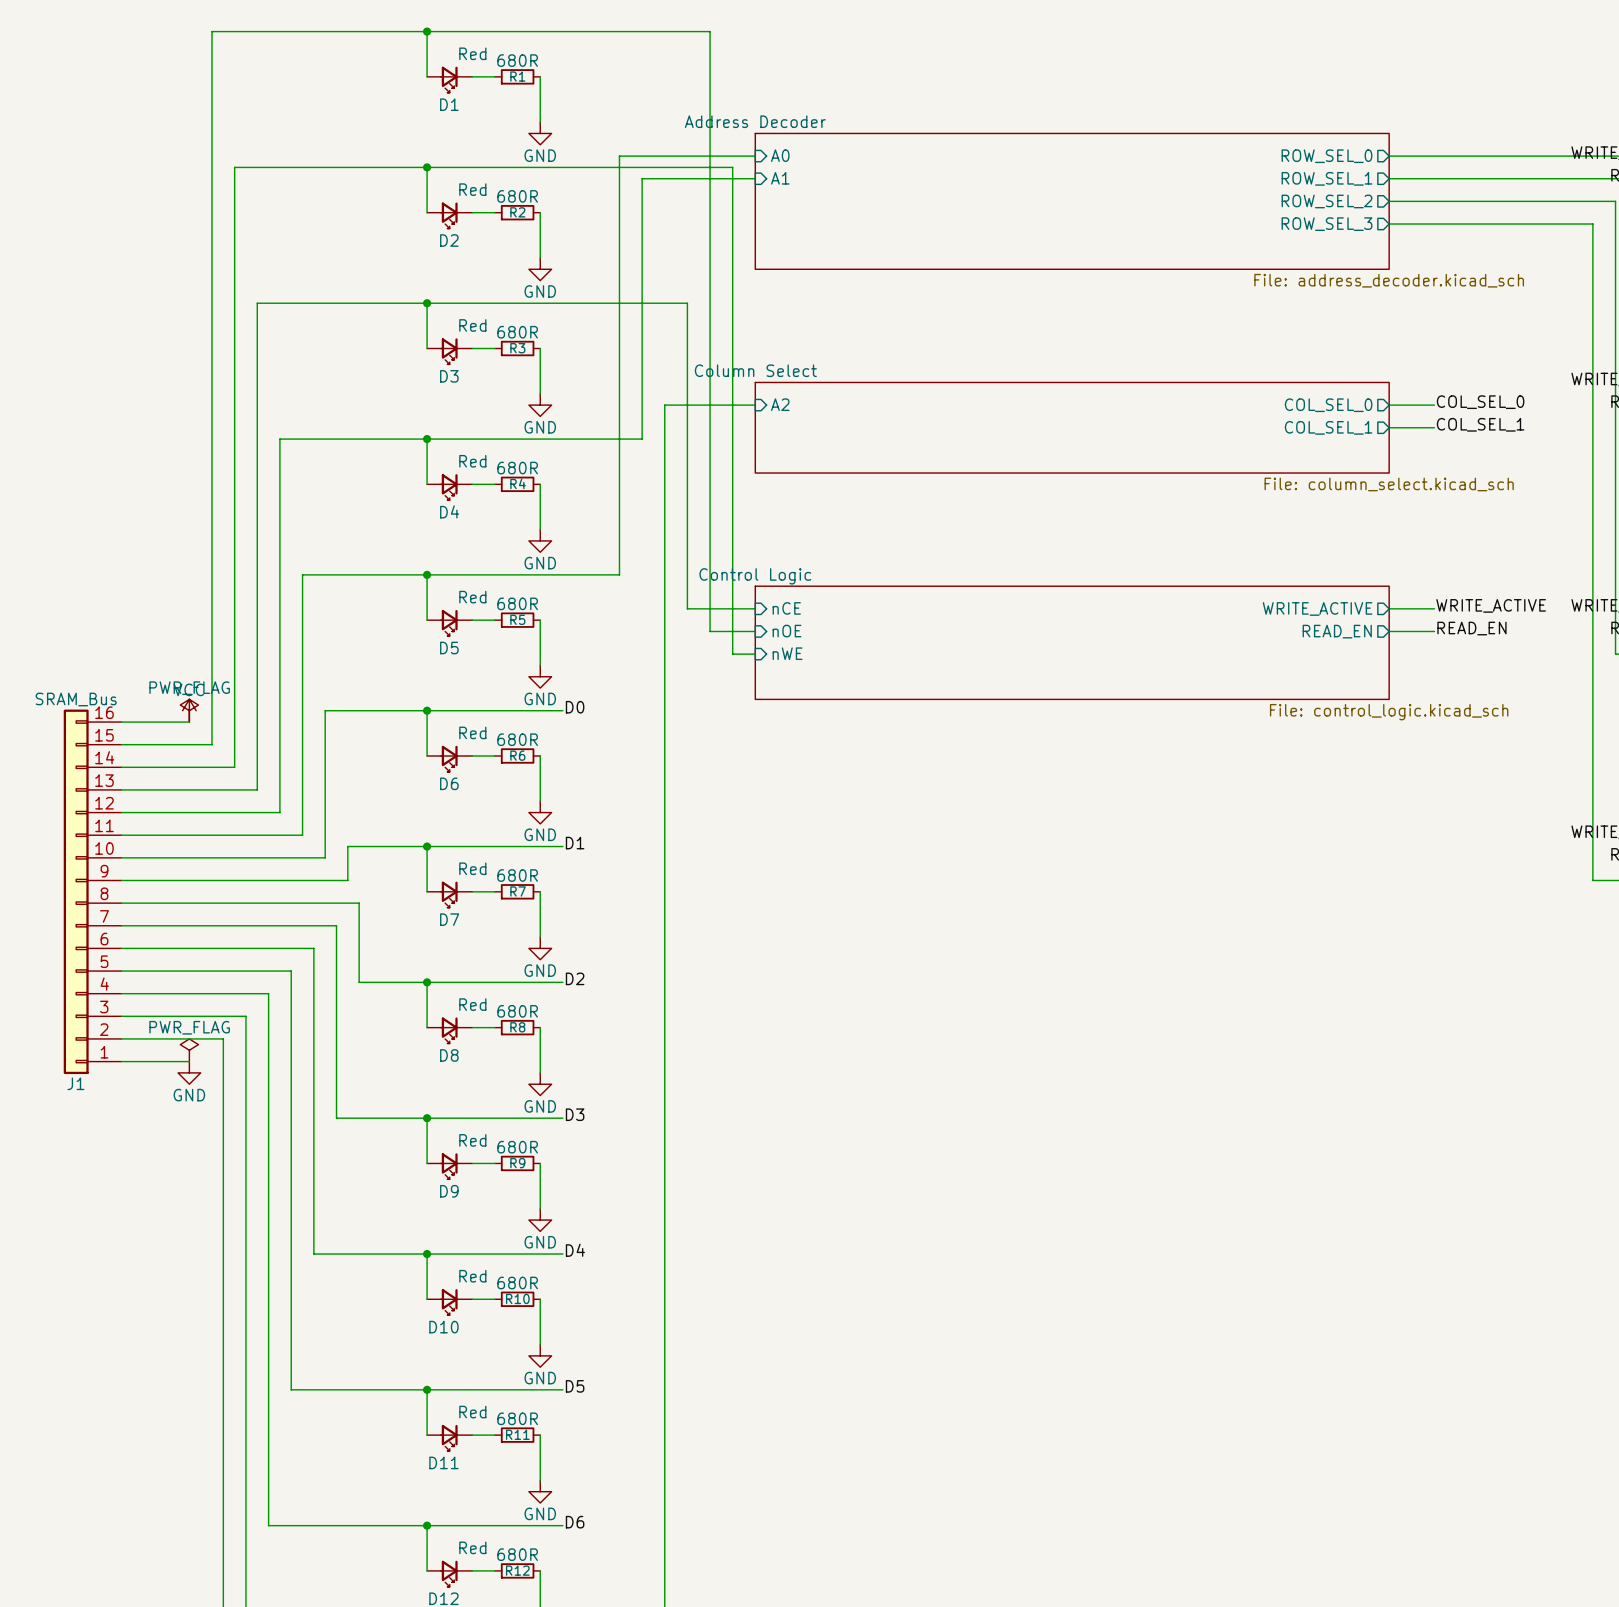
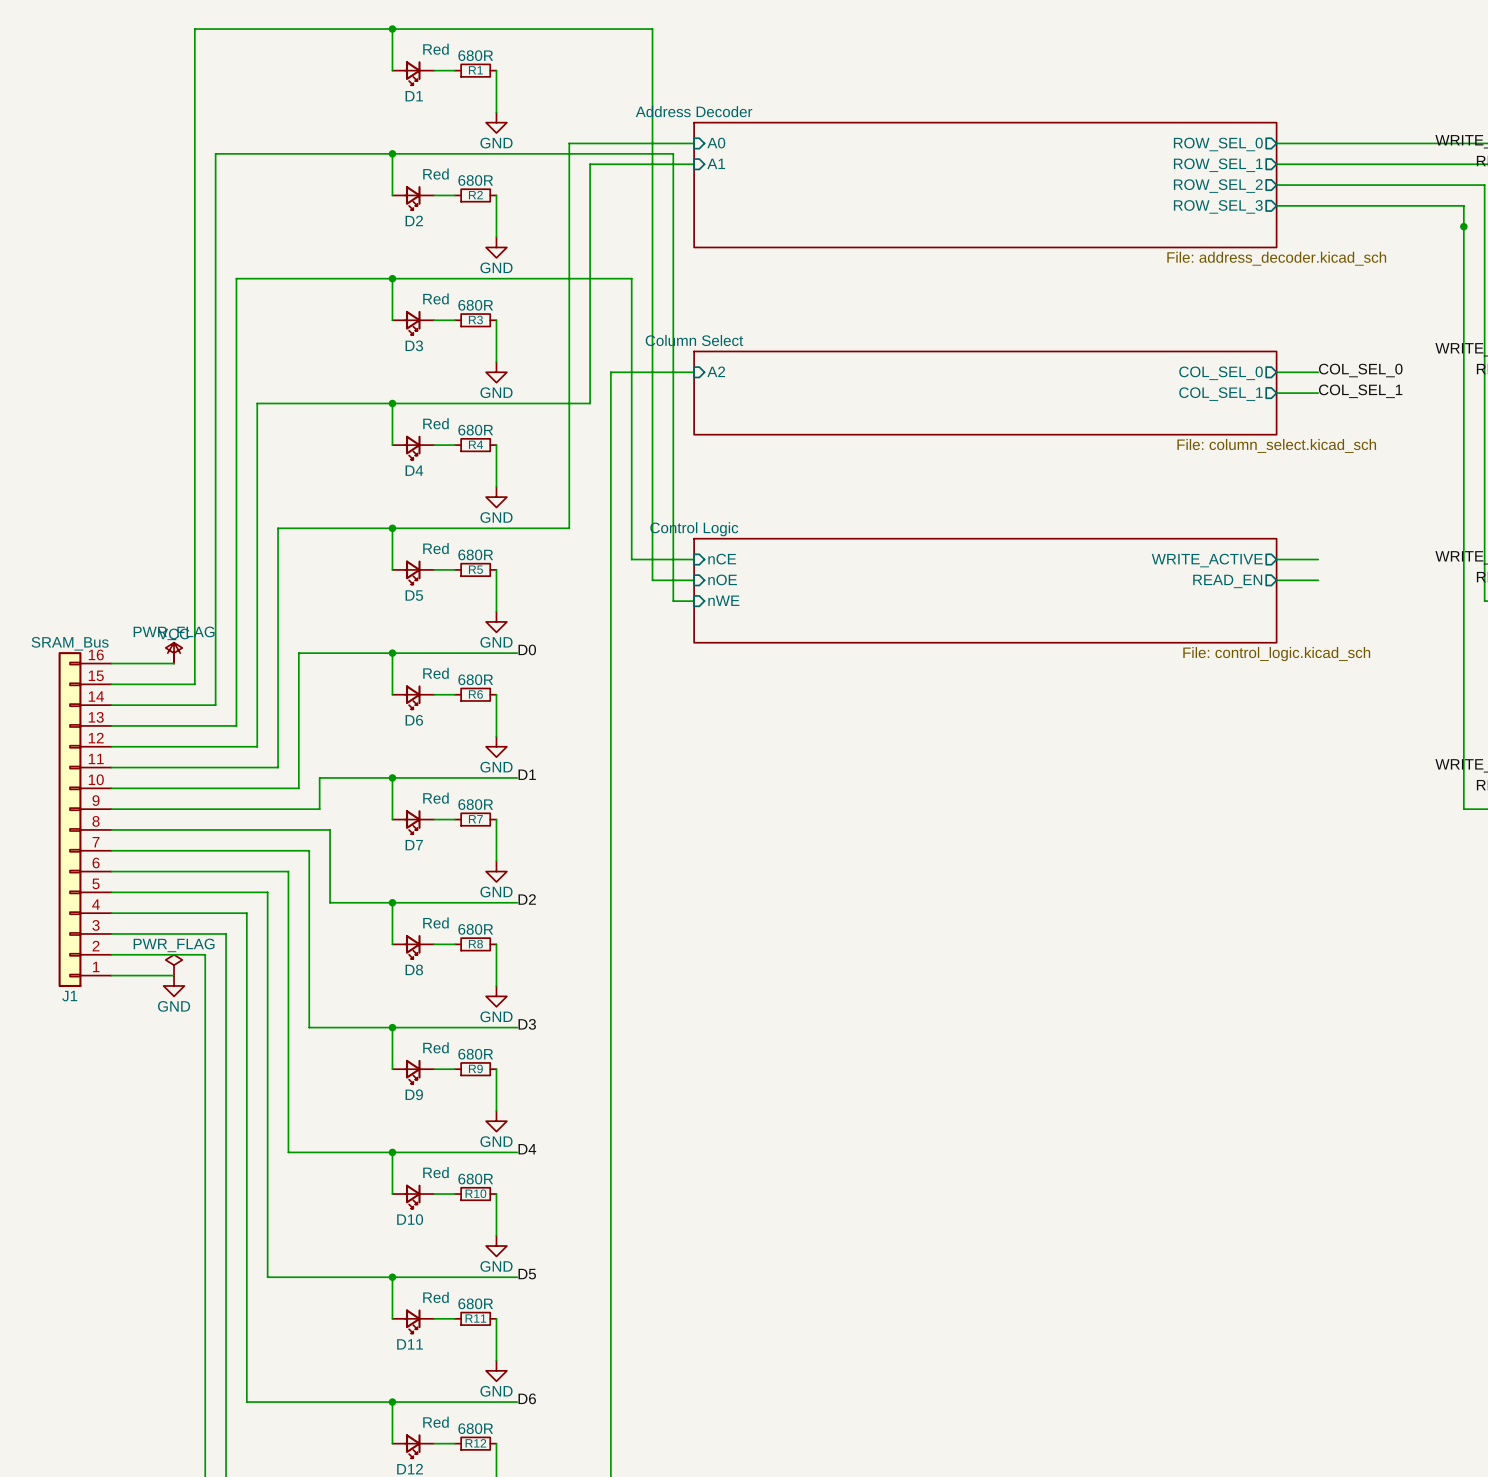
junction: none -> (1463, 226)
label: WRITE_ACTIVE (1491, 605) -> none
label: READ_EN (1471, 628) -> none

